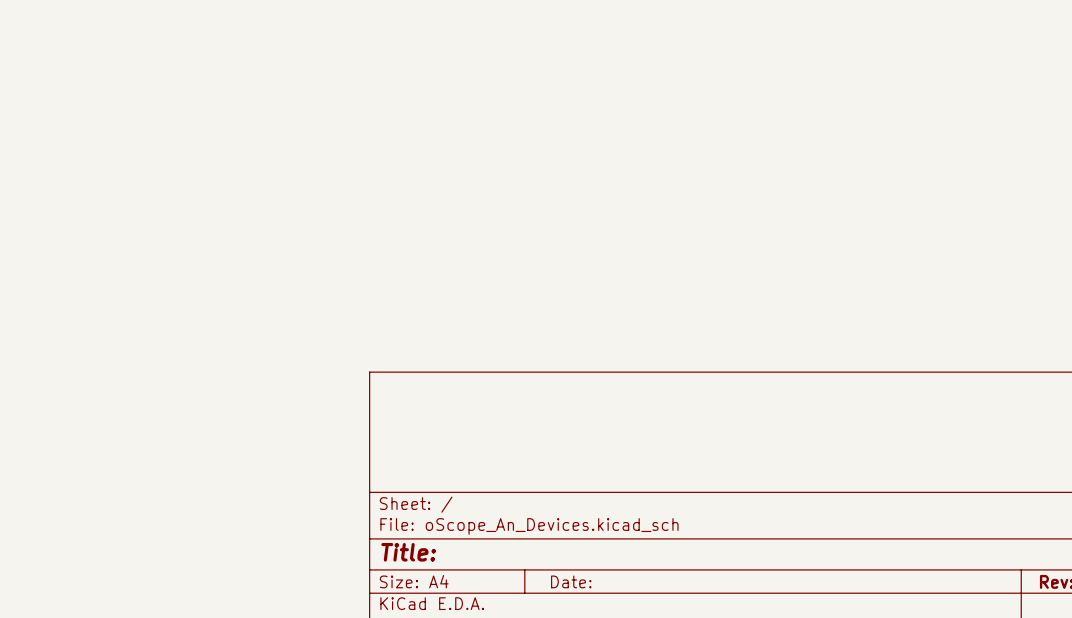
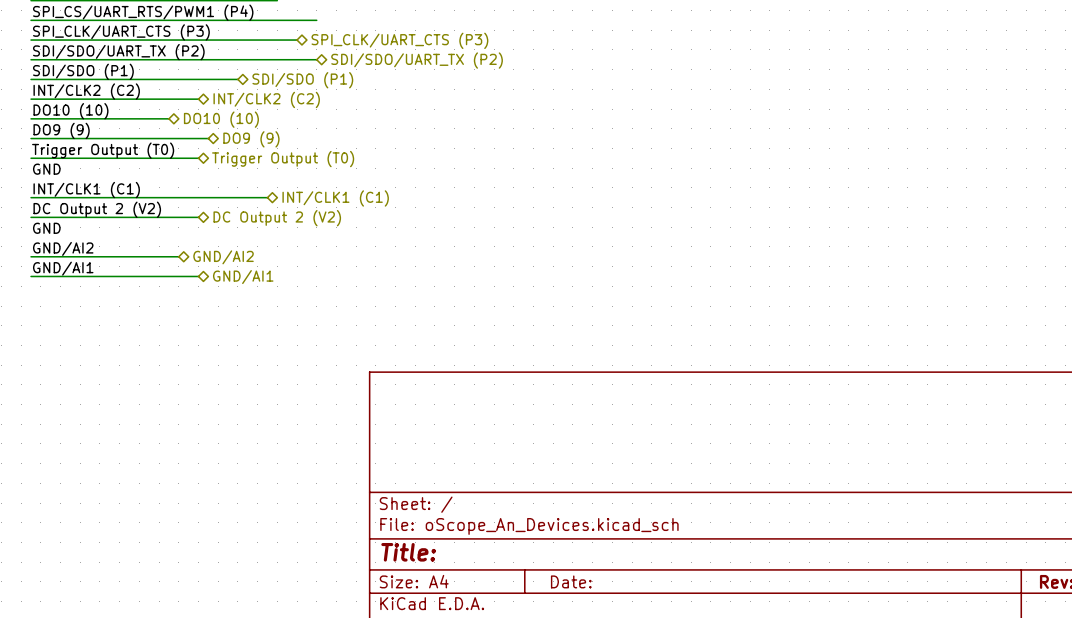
wire: none -> (31, 0) (277, 0)
label: none -> SPI_CS/UART_RTS/PWM1 (P4) (143, 12)
wire: none -> (31, 20) (316, 20)
label: none -> SPI_CLK/UART_CTS (P3) (121, 32)
wire: none -> (31, 40) (297, 40)
hierarchical label: none -> SPI_CLK/UART_CTS (P3) (399, 40)
label: none -> SDI/SDO/UART_TX (P2) (118, 52)
wire: none -> (31, 59) (316, 59)
hierarchical label: none -> SDI/SDO/UART_TX (P2) (417, 60)
label: none -> SDI/SDO (P1) (83, 71)
wire: none -> (31, 79) (237, 79)
hierarchical label: none -> SDI/SDO (P1) (302, 80)
label: none -> INT/CLK2 (C2) (86, 91)
wire: none -> (31, 99) (198, 99)
hierarchical label: none -> INT/CLK2 (C2) (266, 99)
label: none -> DO10 (10) (70, 111)
wire: none -> (31, 118) (168, 118)
hierarchical label: none -> DO10 (10) (221, 119)
label: none -> DO9 (9) (61, 130)
wire: none -> (31, 138) (208, 138)
hierarchical label: none -> DO9 (9) (251, 139)
label: none -> Trigger Output (T0) (103, 150)
wire: none -> (31, 158) (198, 158)
hierarchical label: none -> Trigger Output (T0) (283, 159)
label: none -> GND (46, 169)
label: none -> INT/CLK1 (C1) (86, 190)
wire: none -> (31, 197) (267, 197)
hierarchical label: none -> INT/CLK1 (C1) (335, 198)
label: none -> DC Output 2 (V2) (97, 209)
wire: none -> (31, 217) (198, 217)
hierarchical label: none -> DC Output 2 (V2) (277, 218)
label: none -> GND (46, 228)
label: none -> GND/AI2 (63, 248)
wire: none -> (31, 256) (178, 256)
hierarchical label: none -> GND/AI2 (223, 257)
label: none -> GND/AI1 (63, 268)
wire: none -> (31, 276) (198, 276)
hierarchical label: none -> GND/AI1 (243, 277)

